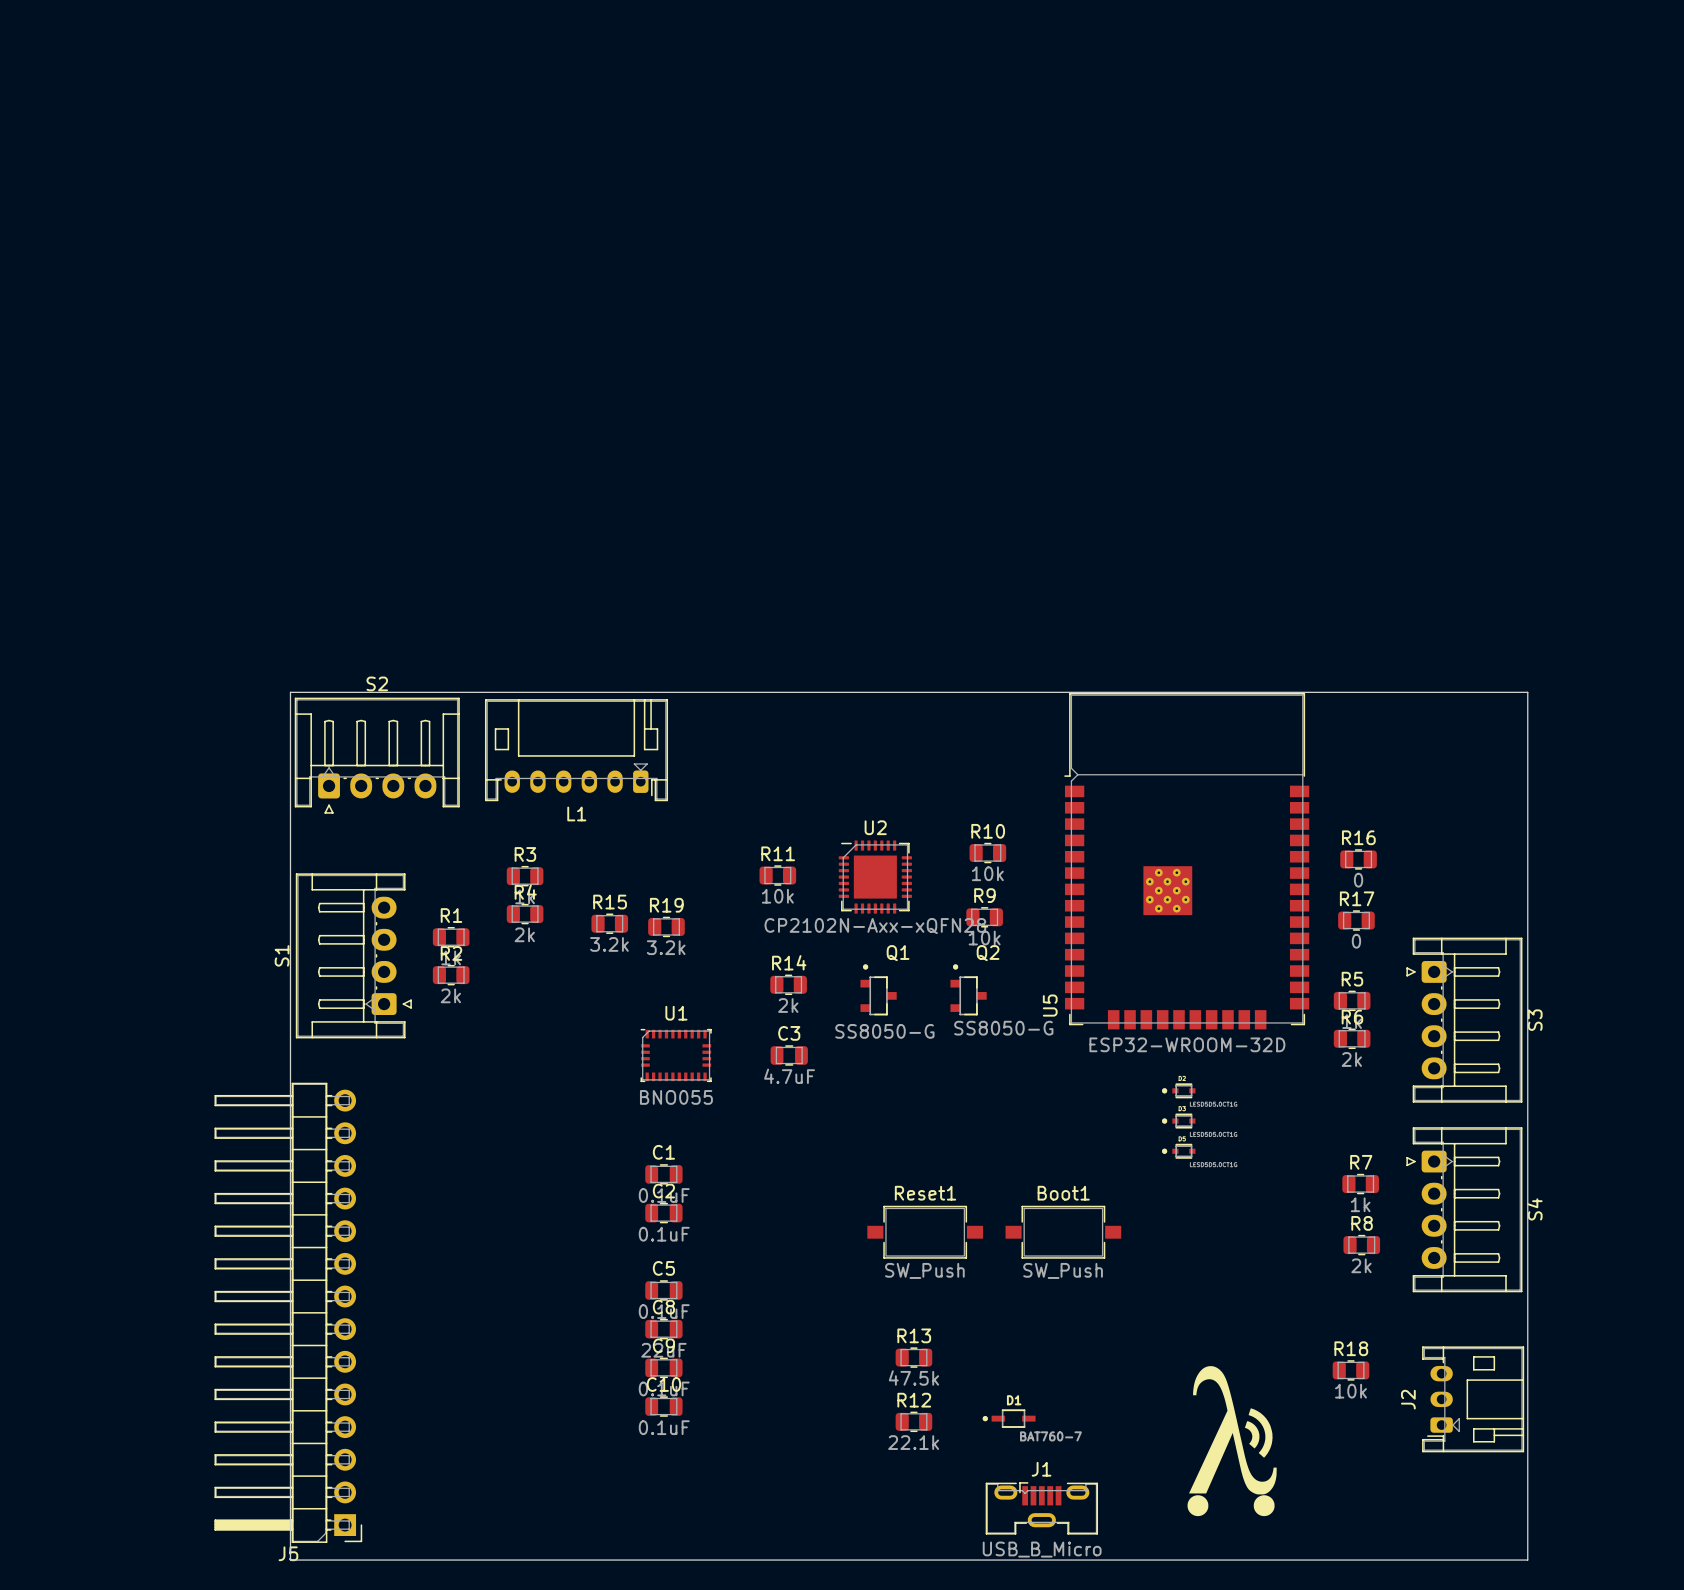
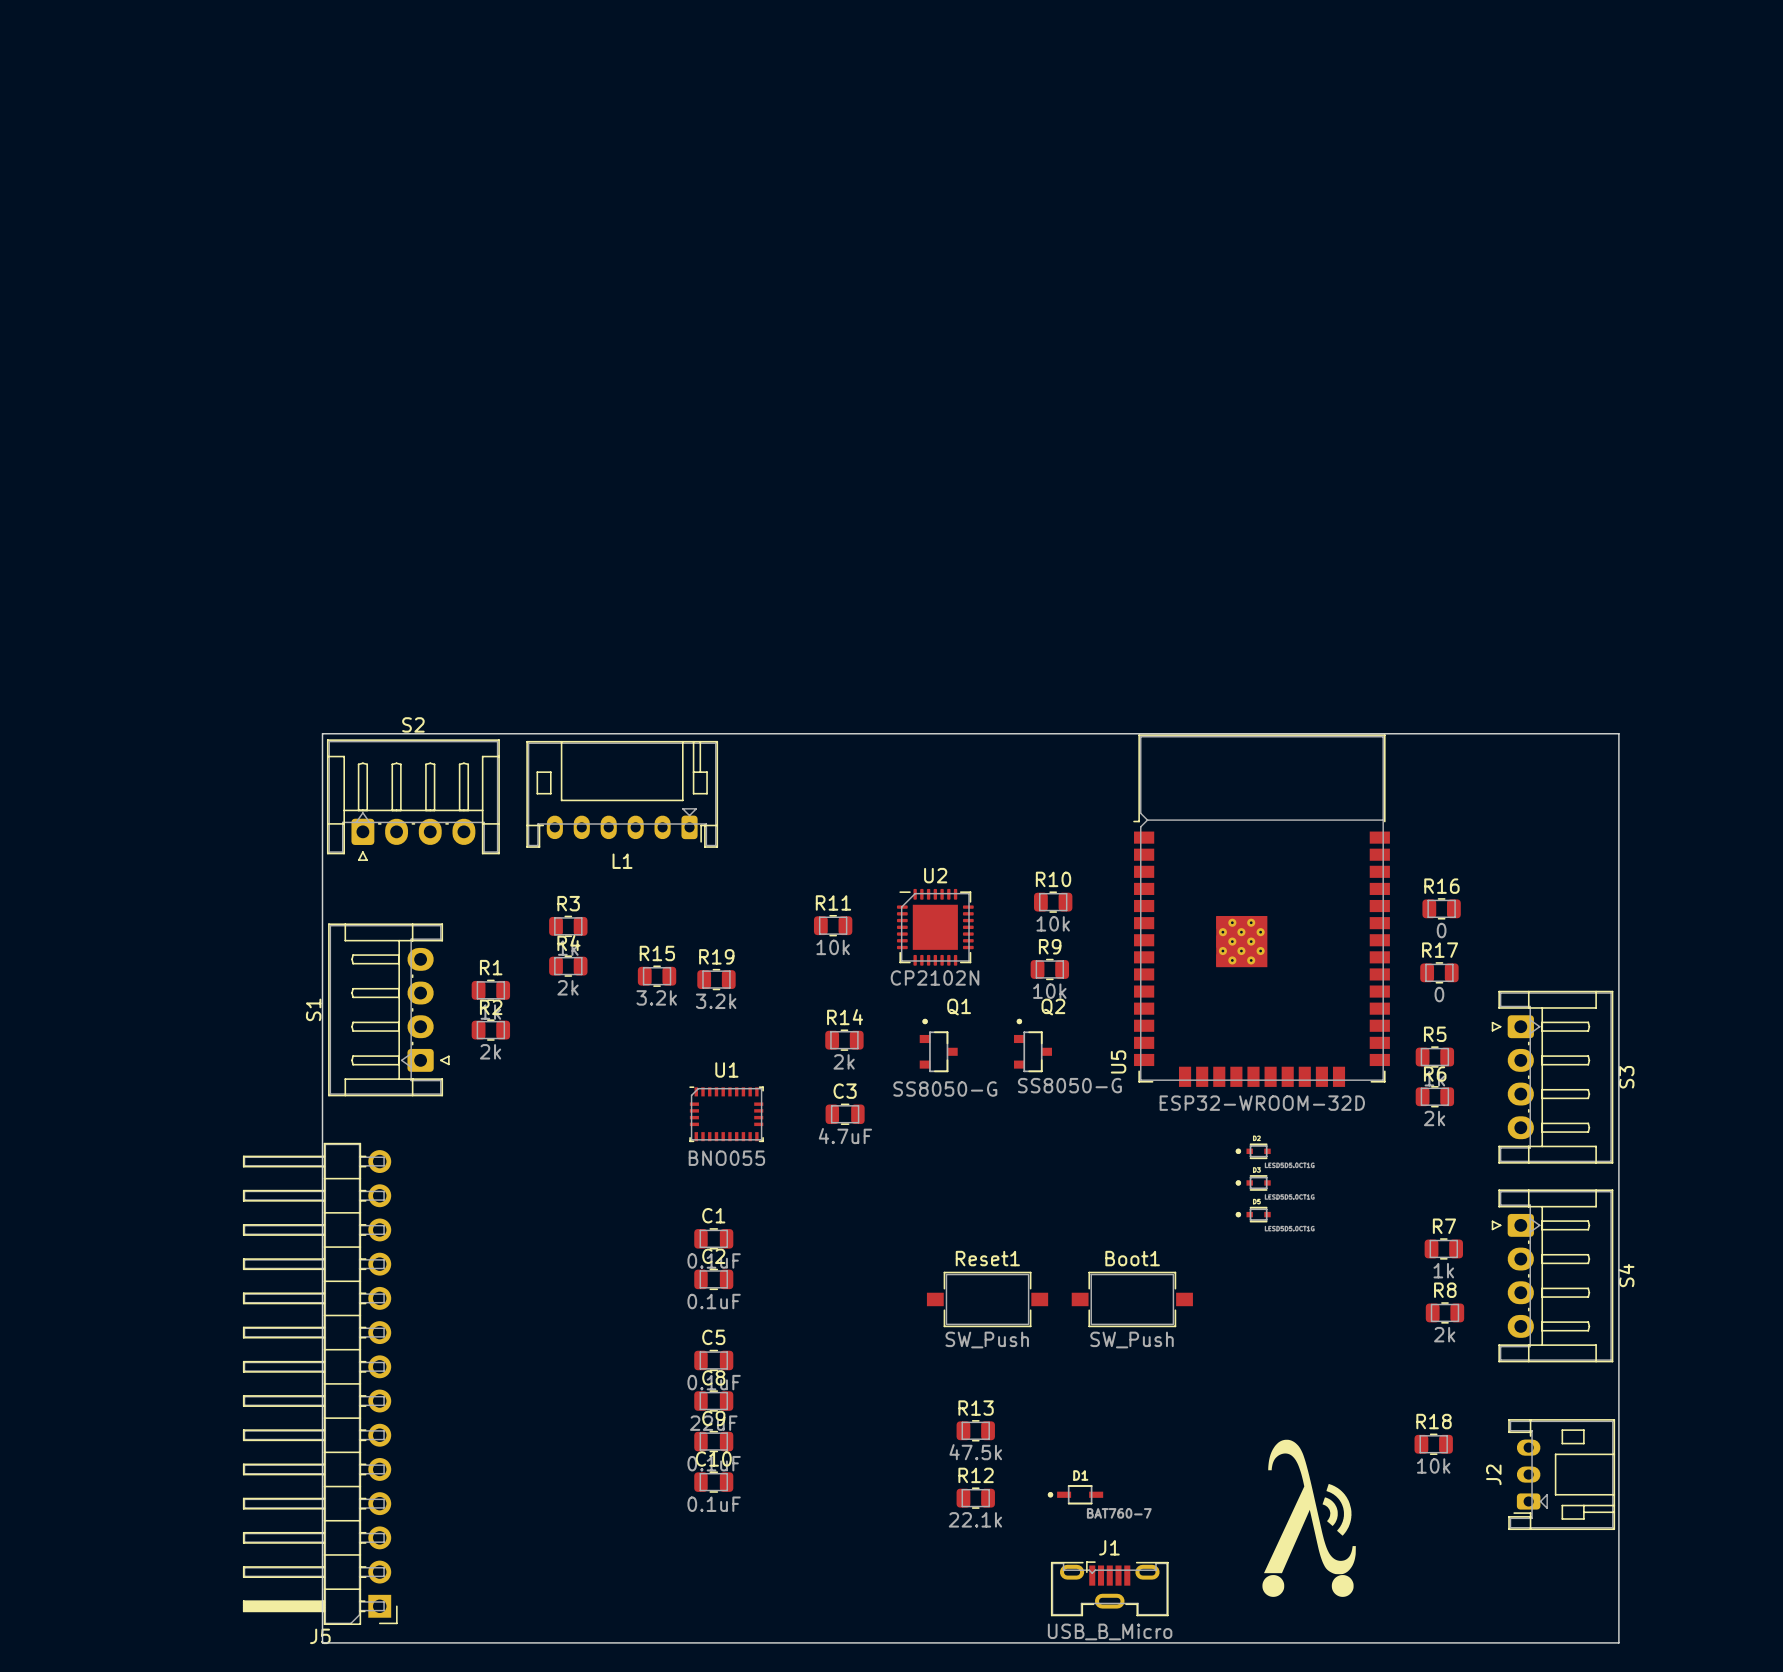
U2 value: CP2102N-Axx-xQFN28 (875, 926) -> CP2102N (935, 977)

